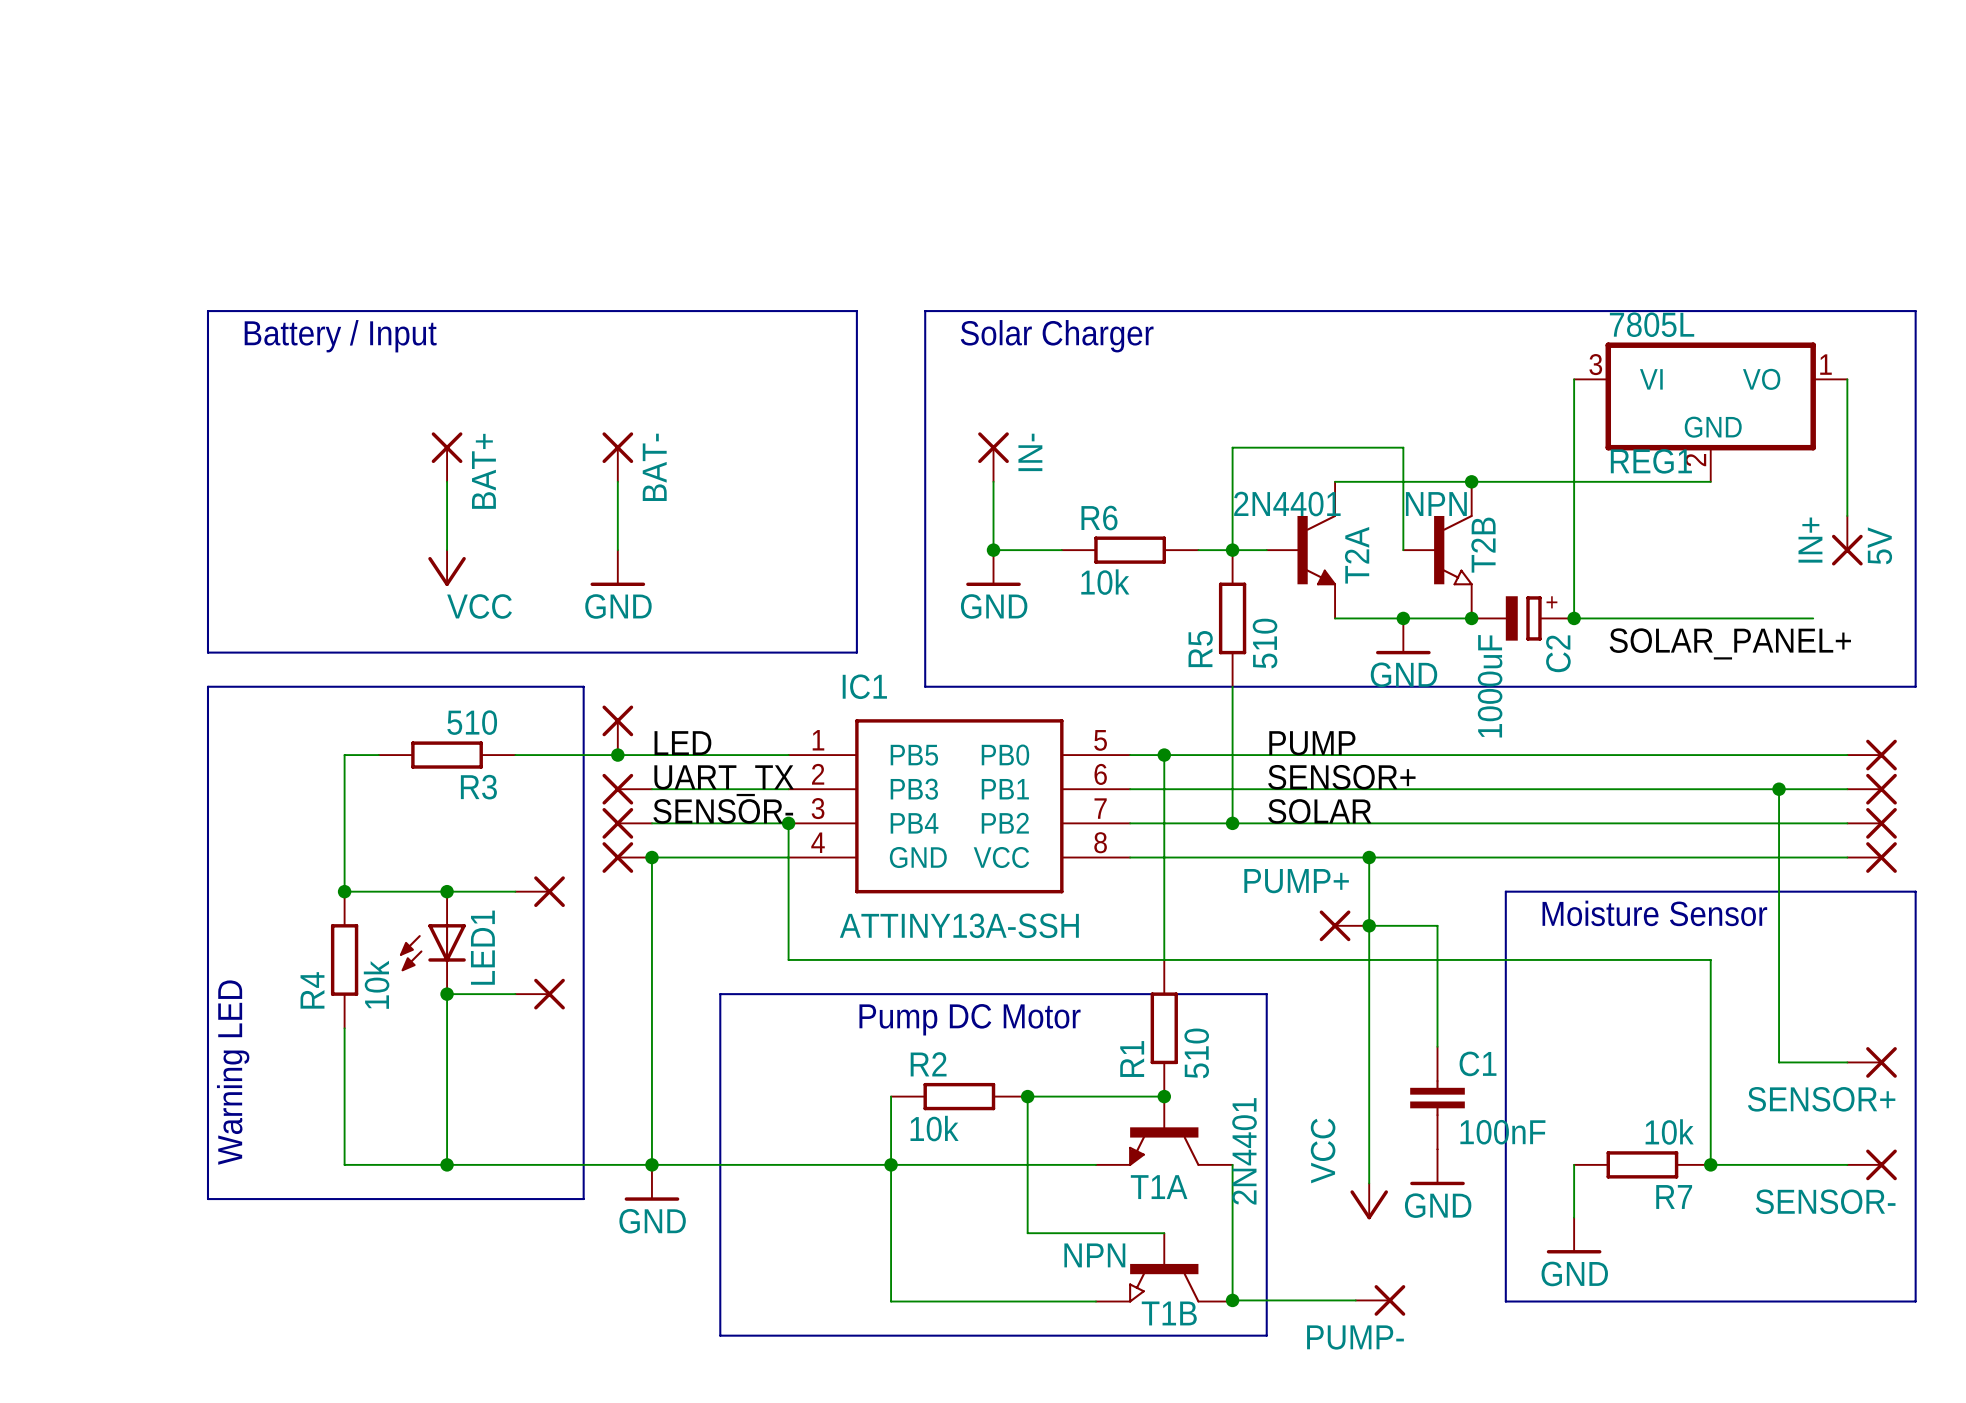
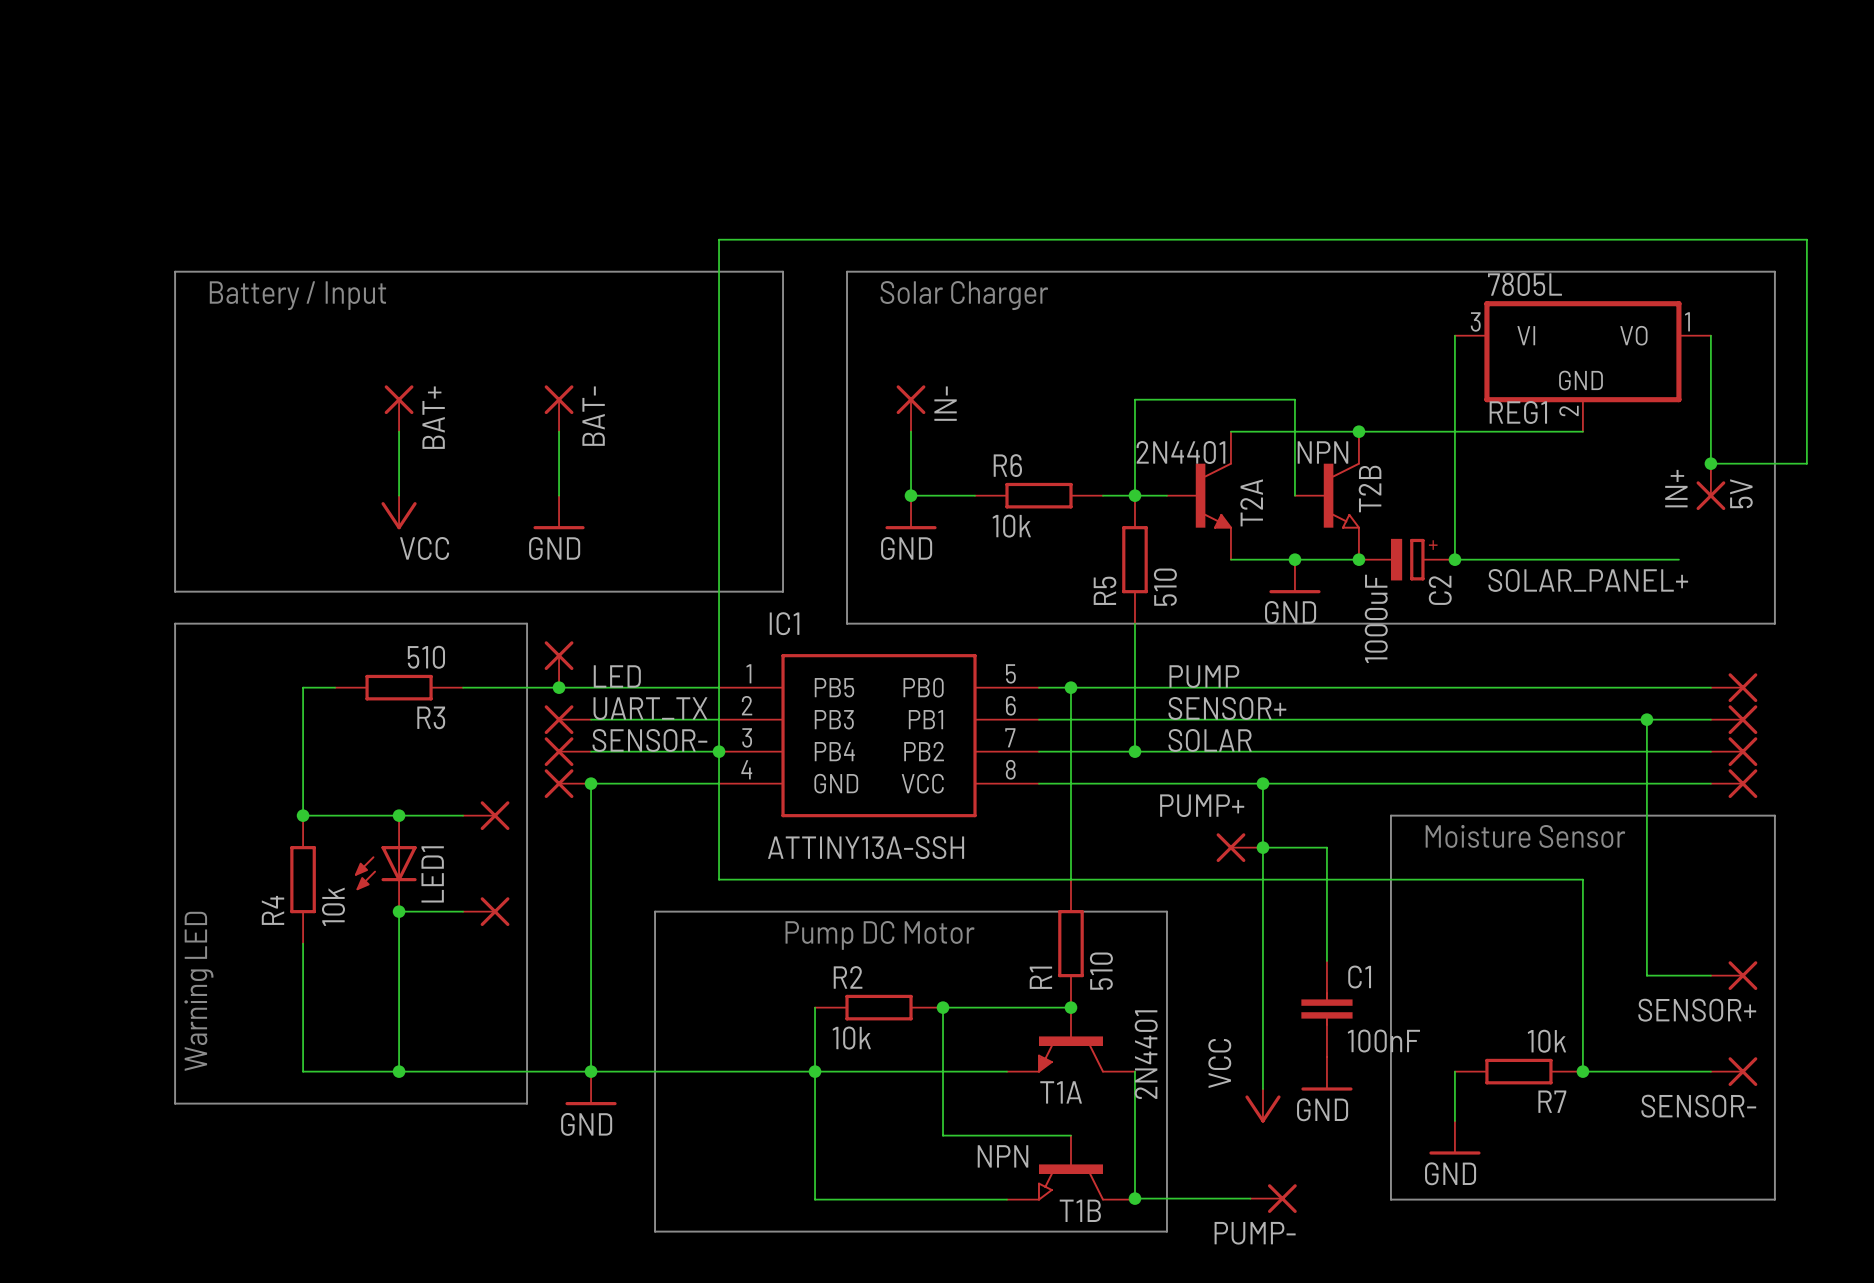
wire: none -> (1710, 463) (1806, 463) (1806, 239) (719, 239) (719, 751)
junction: none -> (1710, 463)

